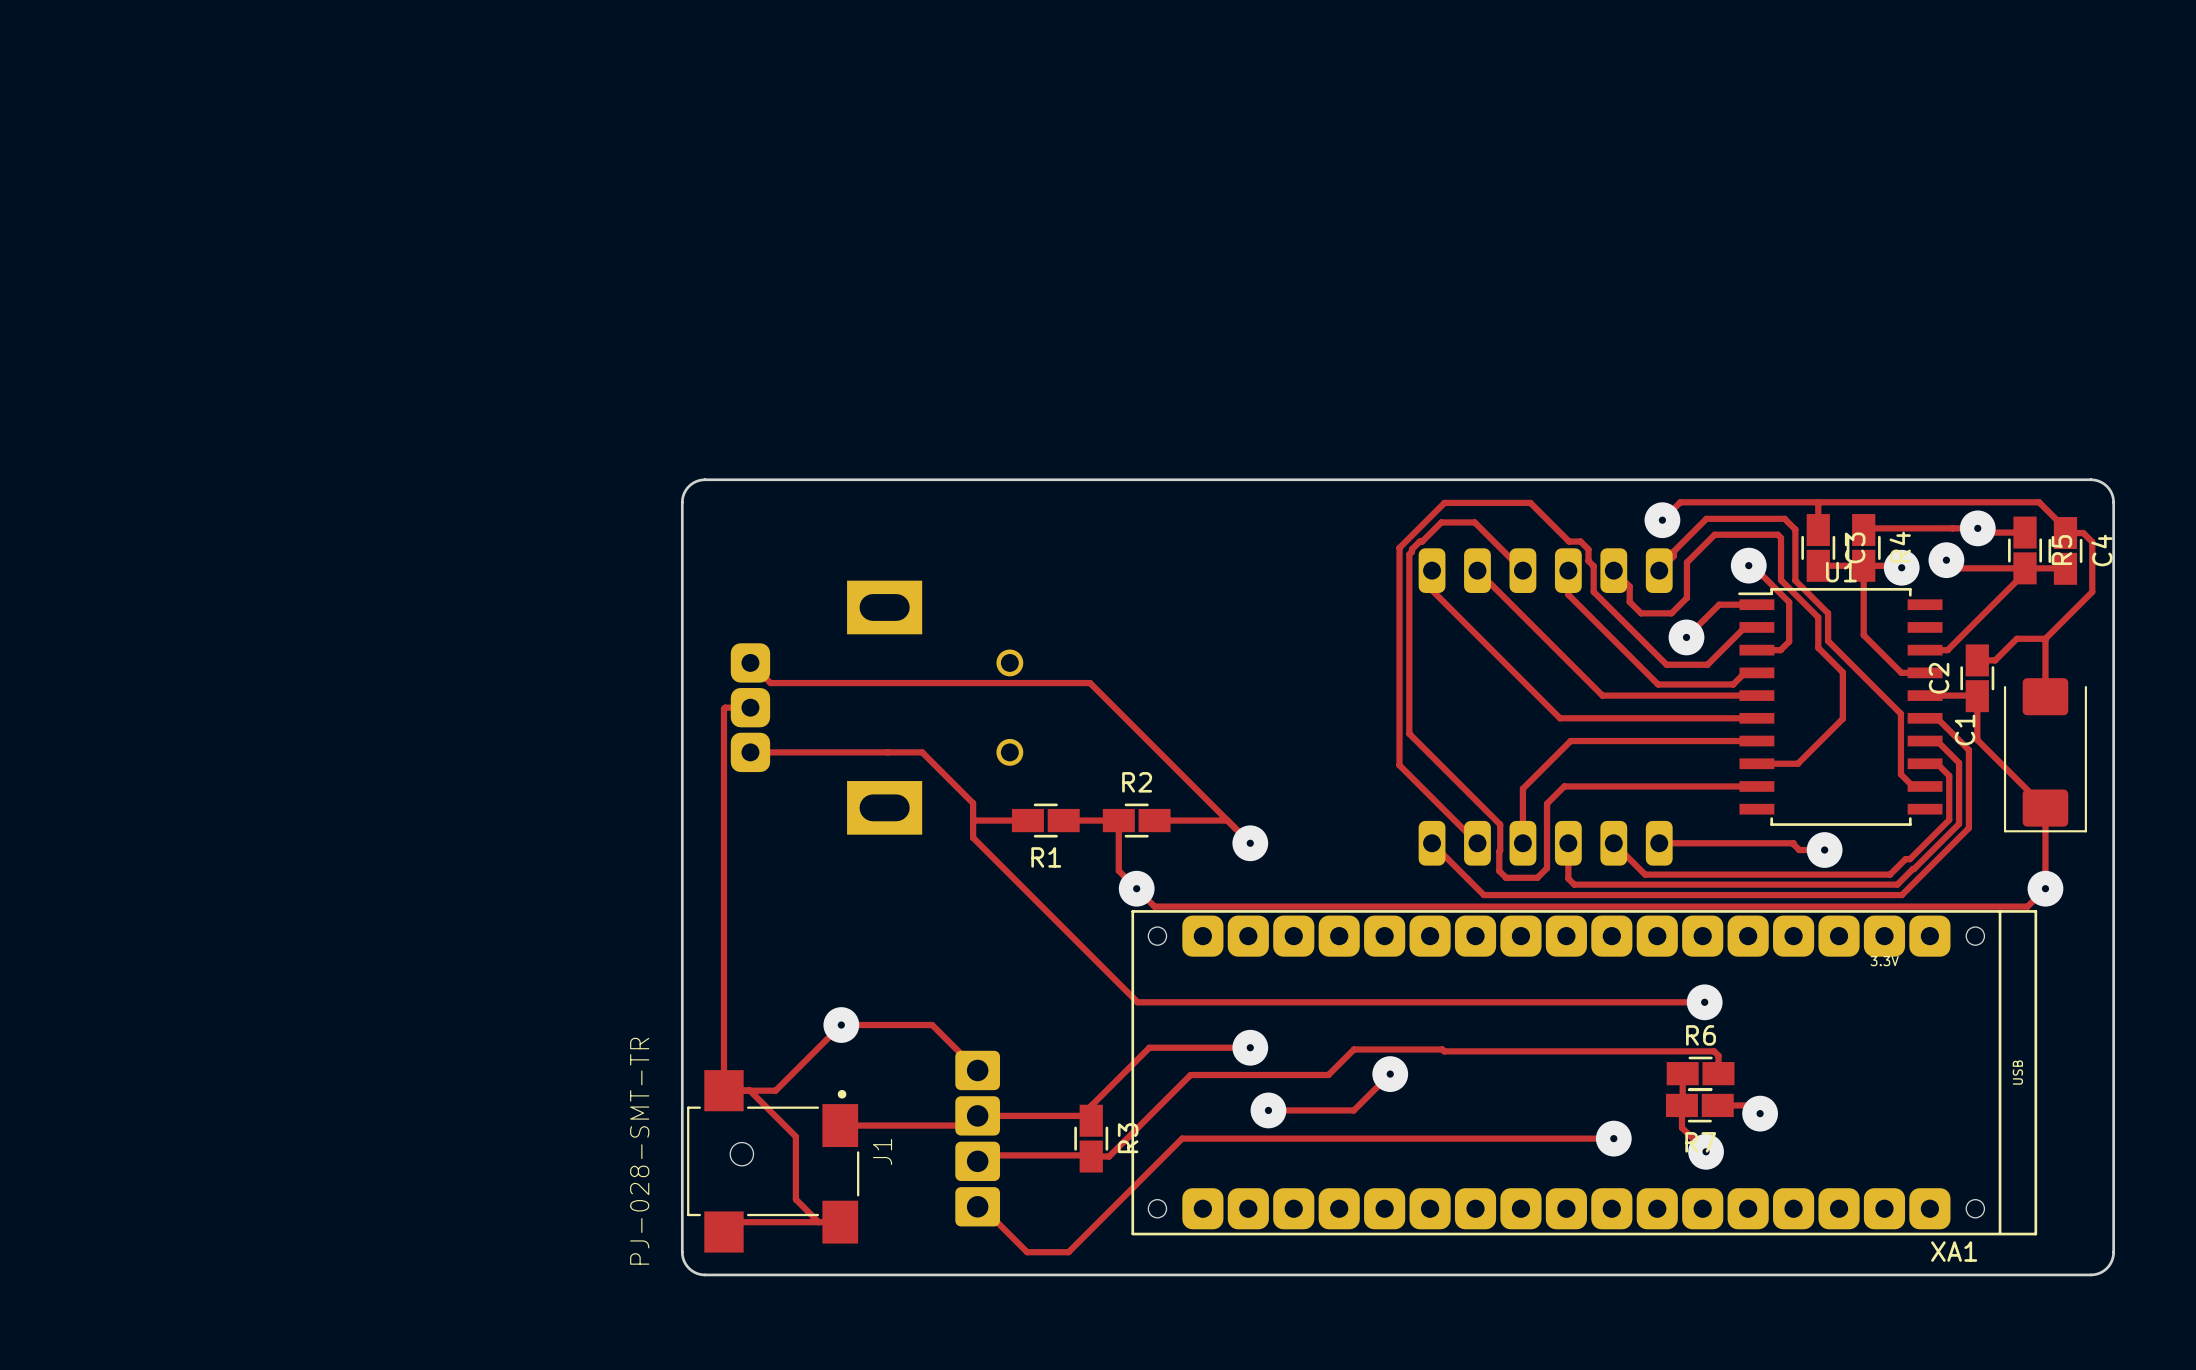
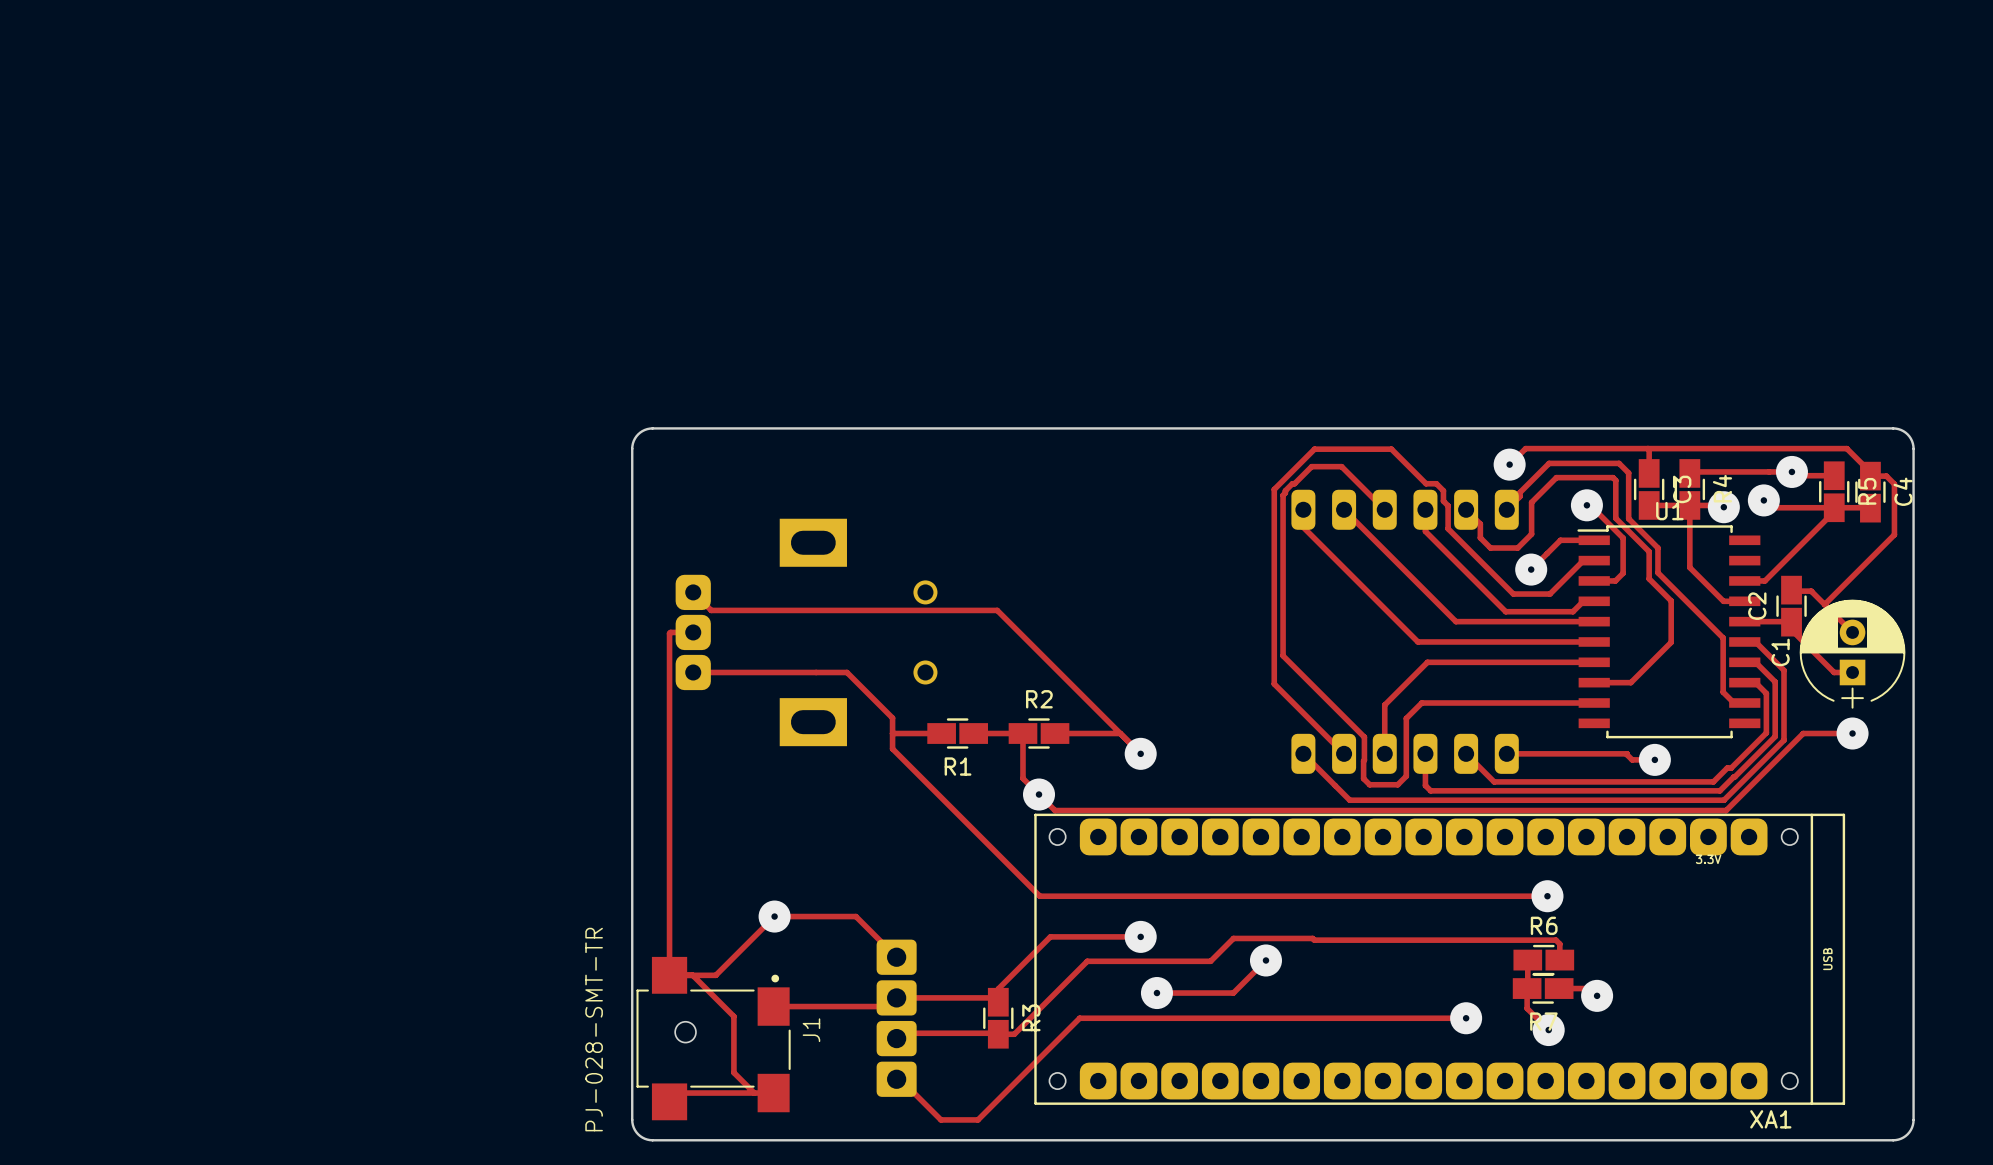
track: (2092, 591) (2045, 638) -> (1894, 528) (1894, 534) (1824, 604)
track: (2045, 638) (2016, 638) (1995, 660) (1977, 660) -> none
track: (2045, 638) (2045, 696) -> none
track: none -> (1791, 591) (1811, 591) (1852, 632)
C1 footprint: [2003, 678, 2087, 833] -> [1799, 599, 1906, 709]
track: (1977, 704) (1977, 739) (2045, 808) (2045, 888) (2027, 906) (1904, 906) -> (1852, 733) (1803, 733) (1726, 810)
track: none -> (1791, 629) (1834, 672) (1852, 672)
via position: (2045, 888) -> (1852, 733)

